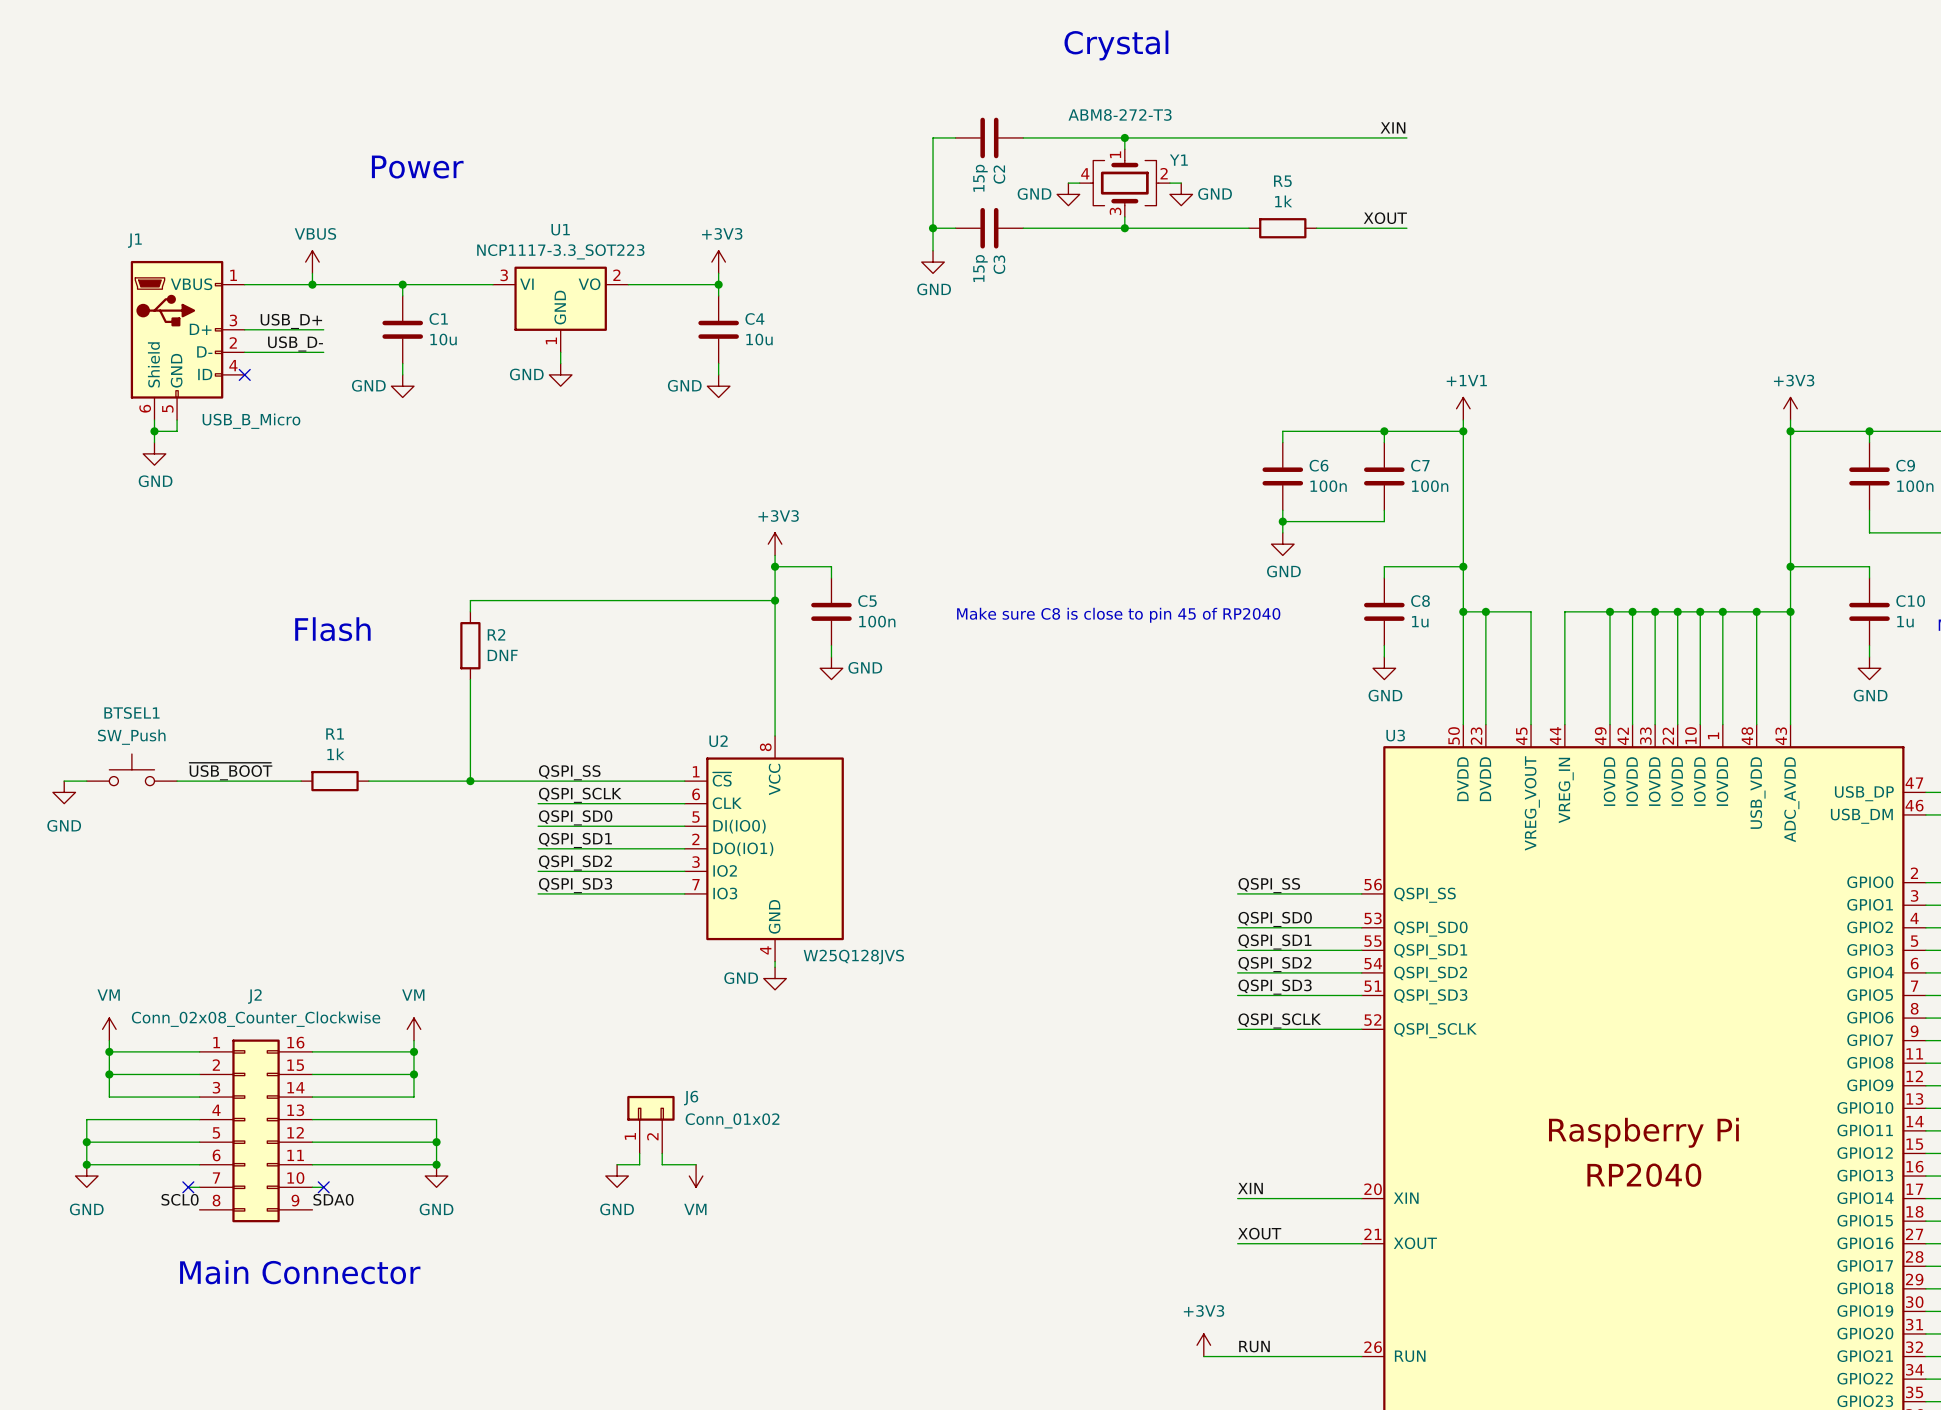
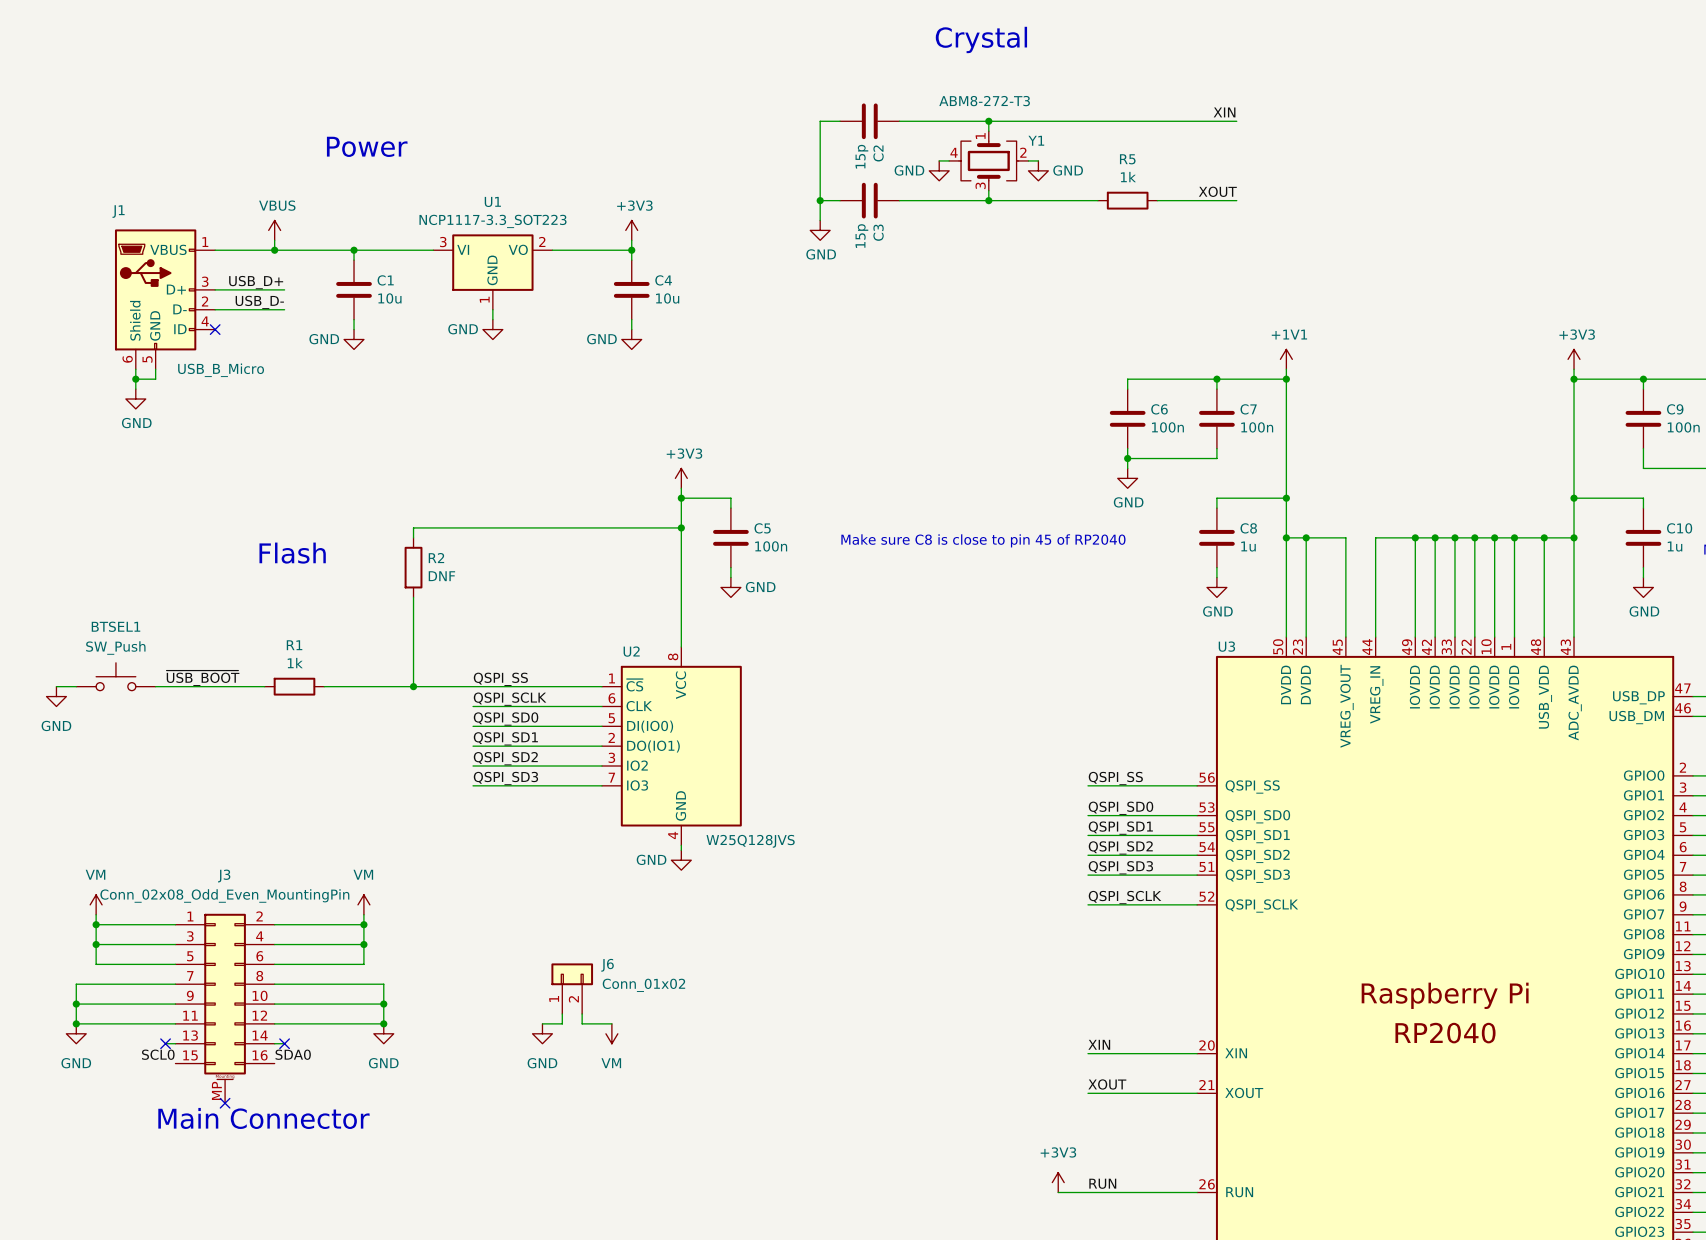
J2: Conn_02x08_Counter_Clockwise (256, 1130) -> none
J3: none -> Conn_02x08_Odd_Even_MountingPin (225, 1008)
no-connect mark: none -> (225, 1103)

